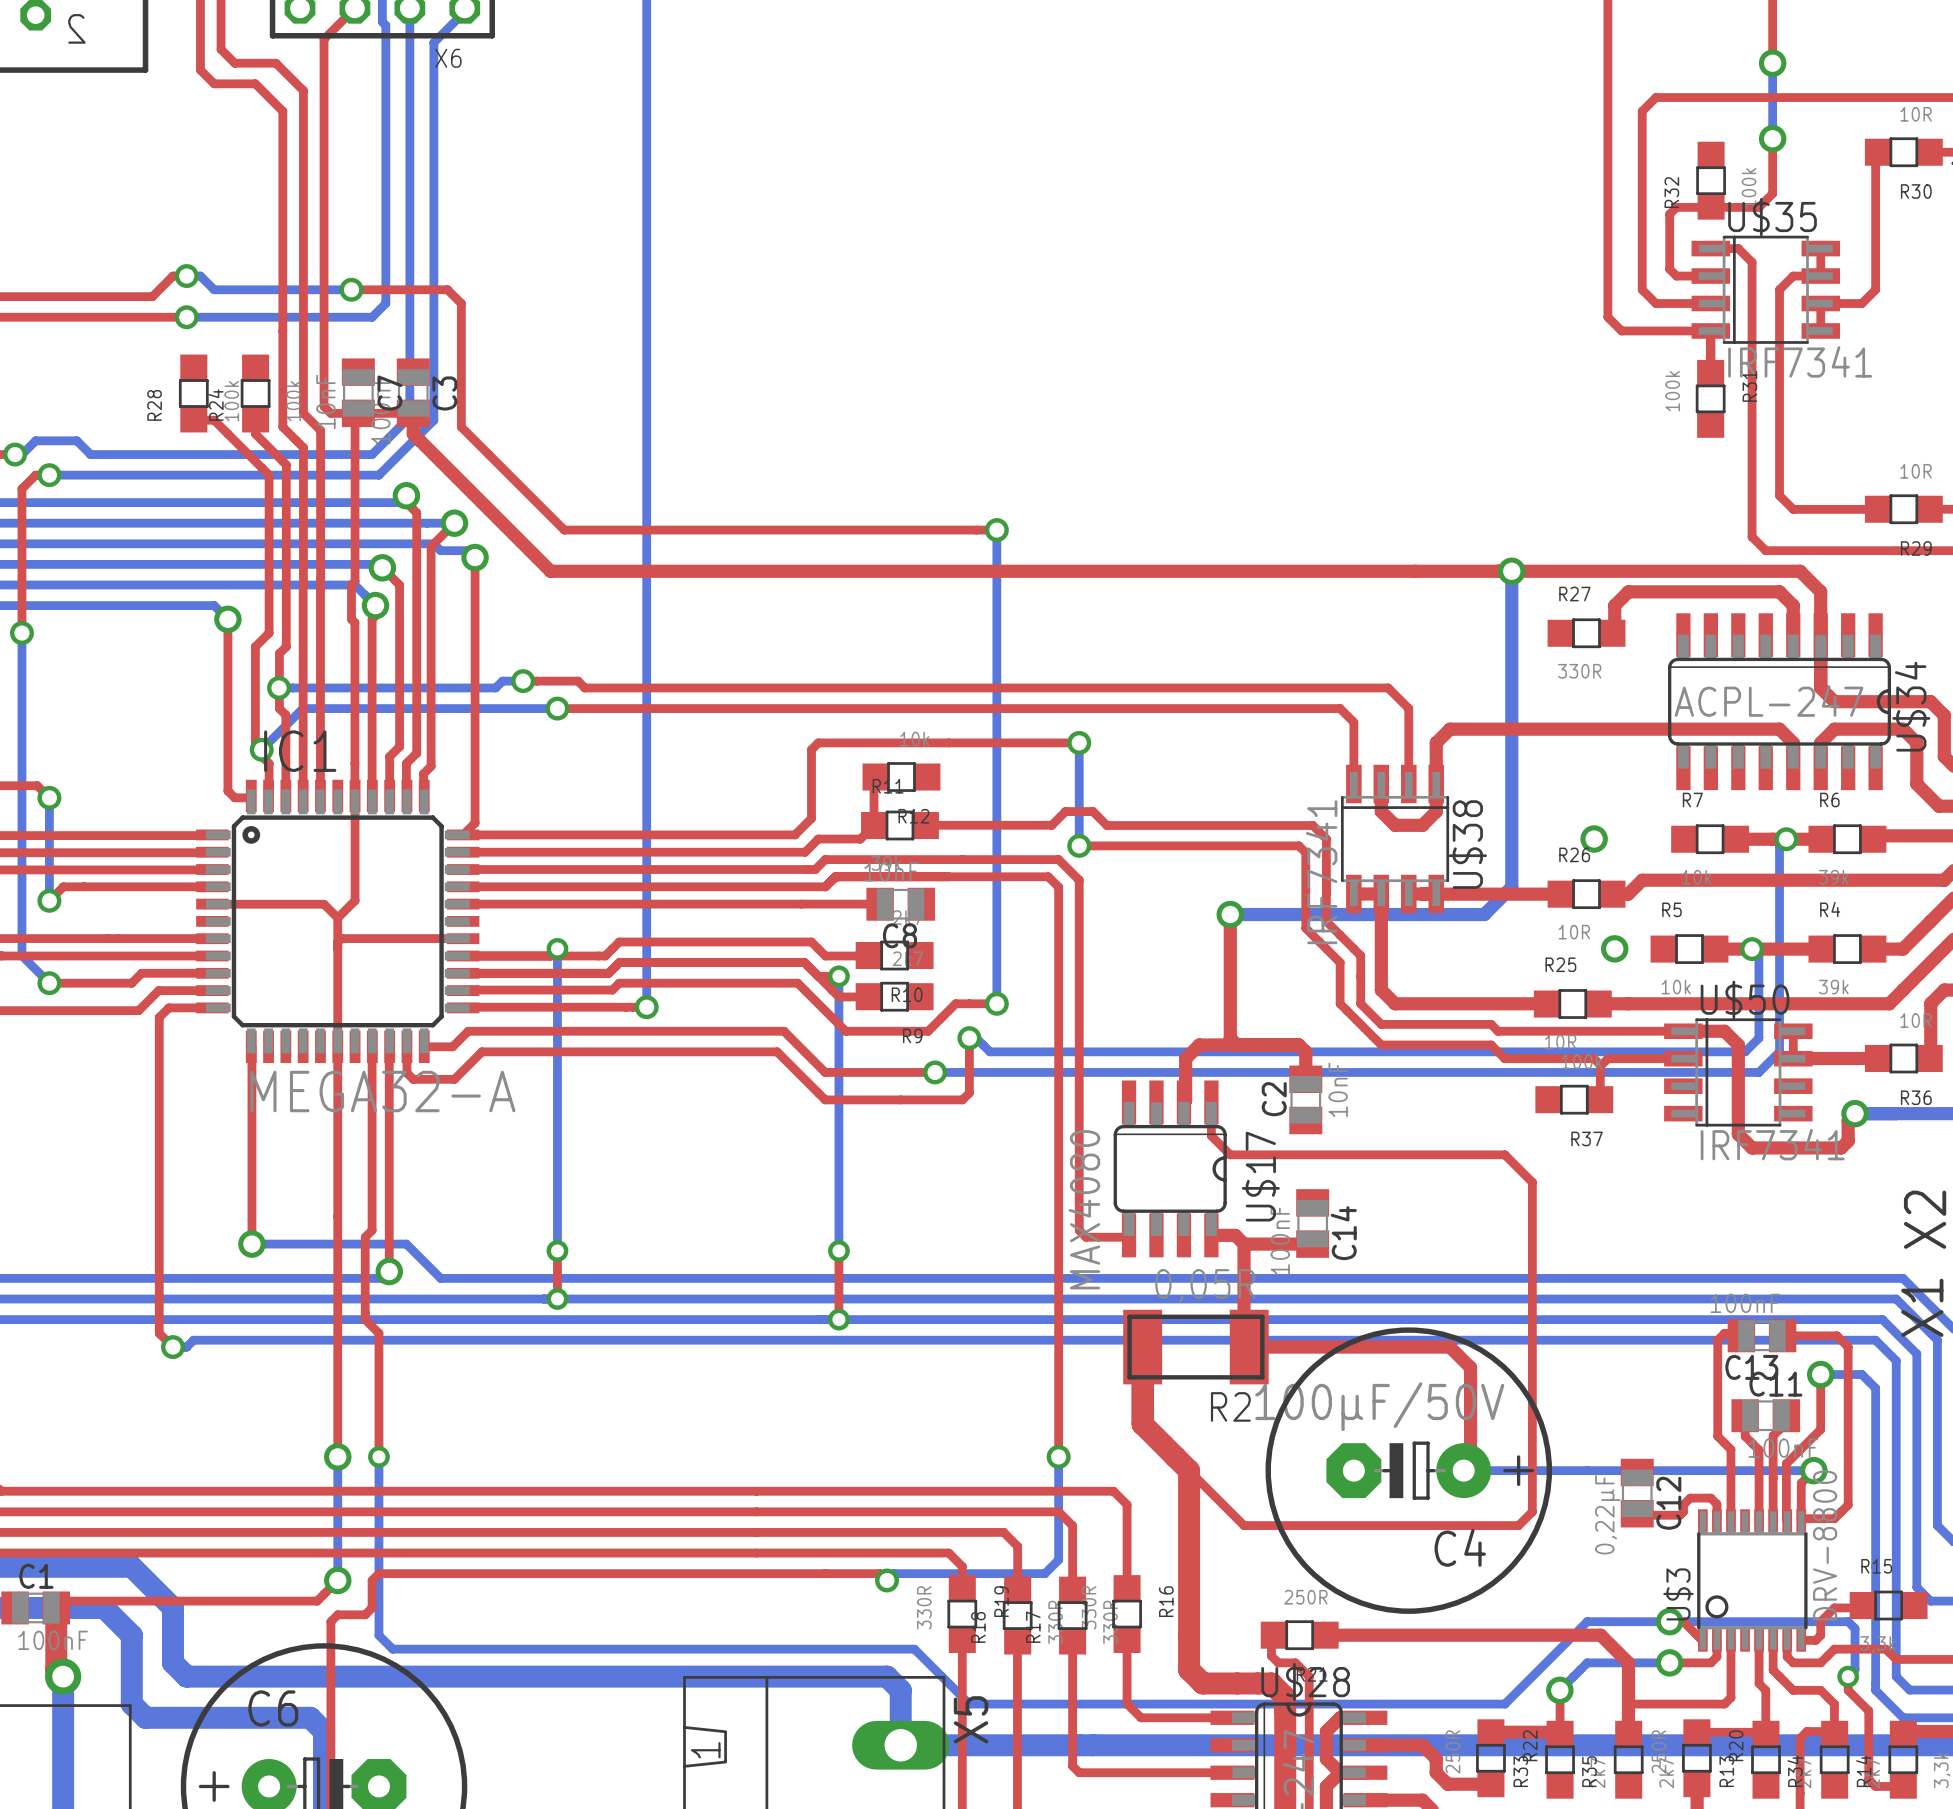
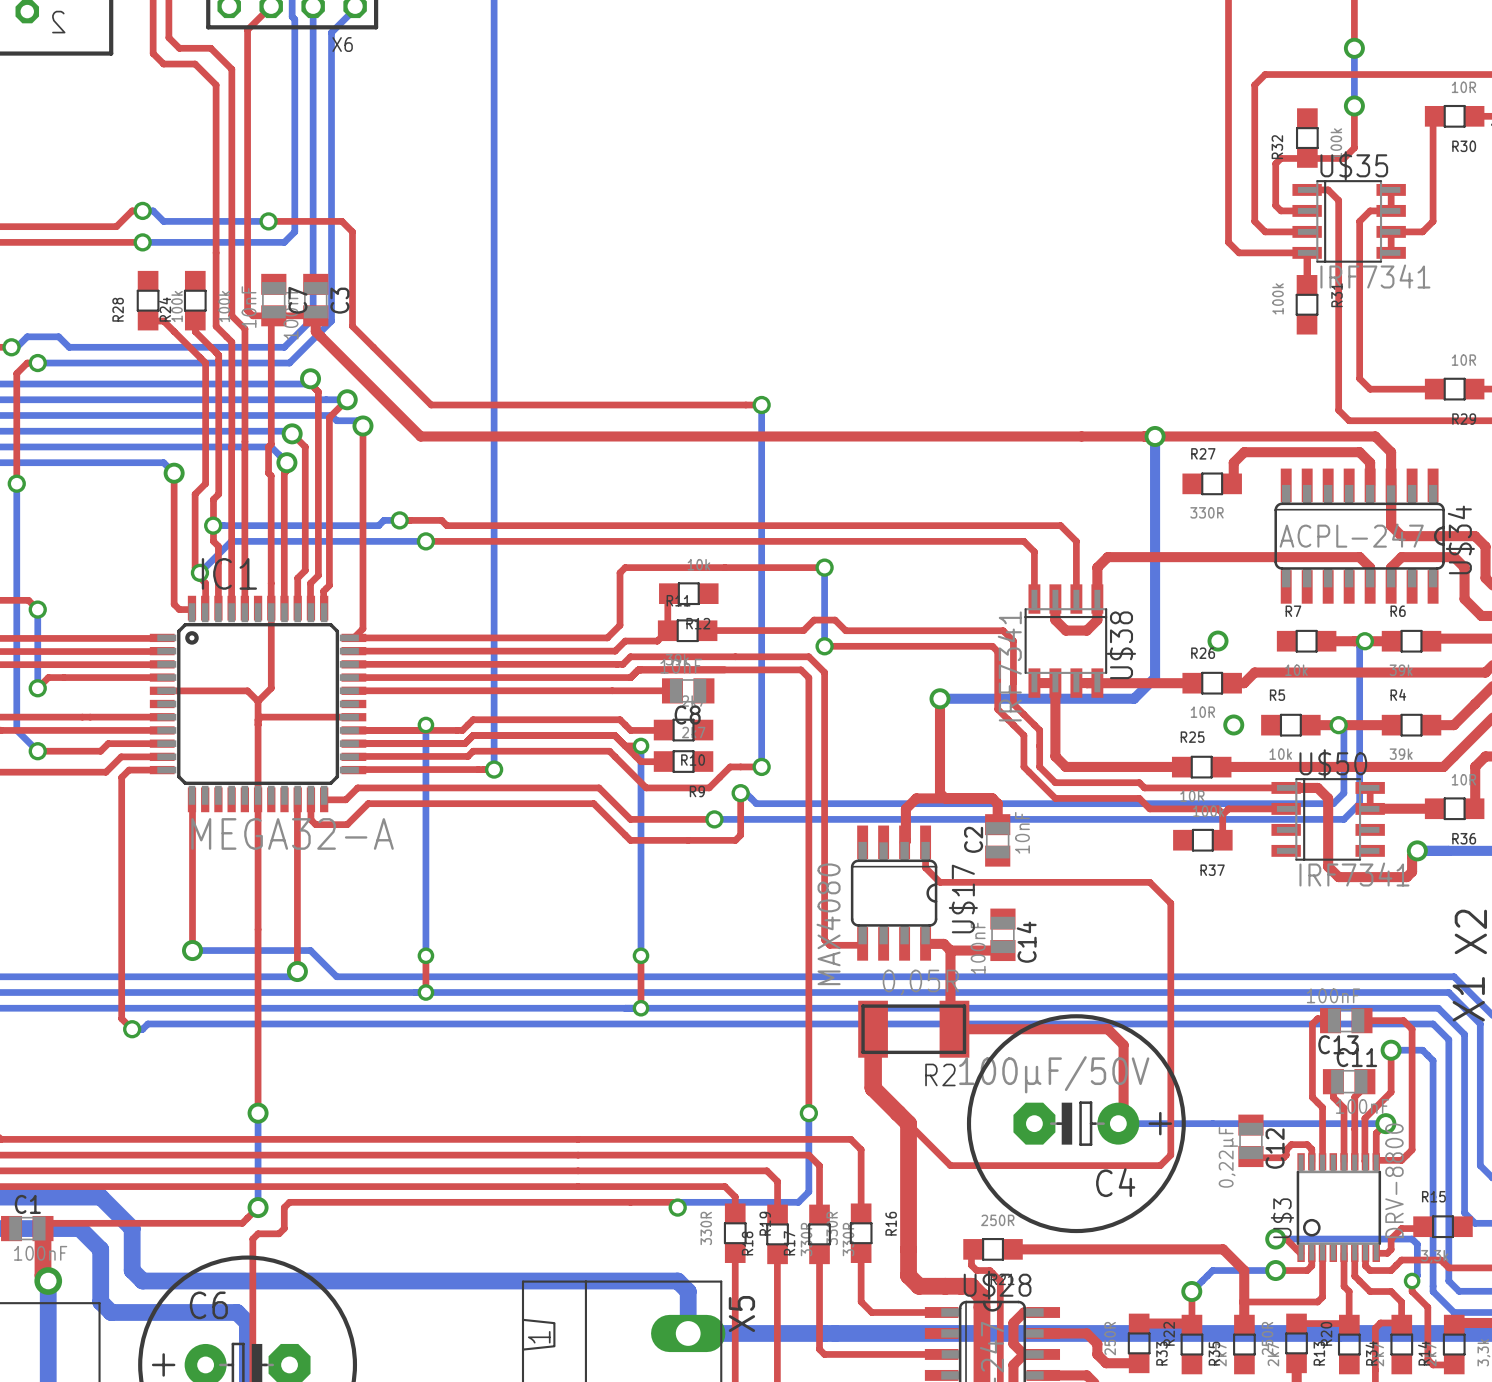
top track: (372, 1047) (372, 1230) (365, 1237) (365, 1319) (378, 1333) (378, 1456) -> none
bottom track: (378, 1456) (378, 1635) (392, 1649) (914, 1649) (969, 1704) (1504, 1704) (1587, 1621) (1669, 1621) -> none
via: (378, 1456) -> none

